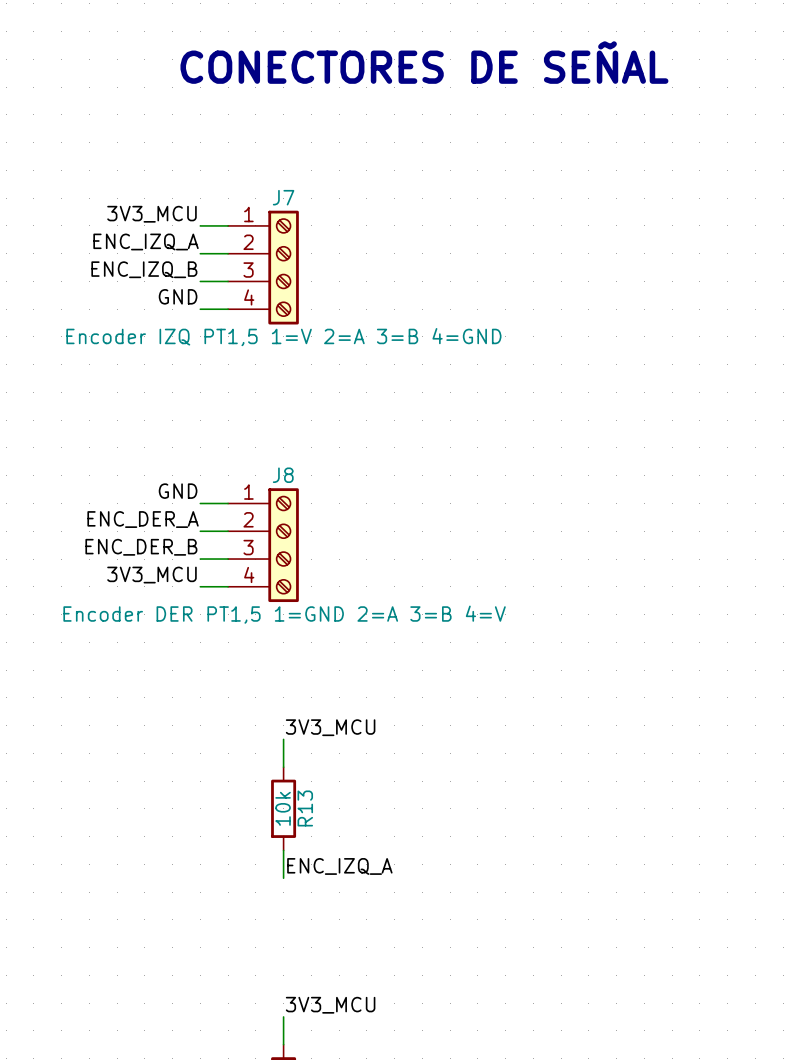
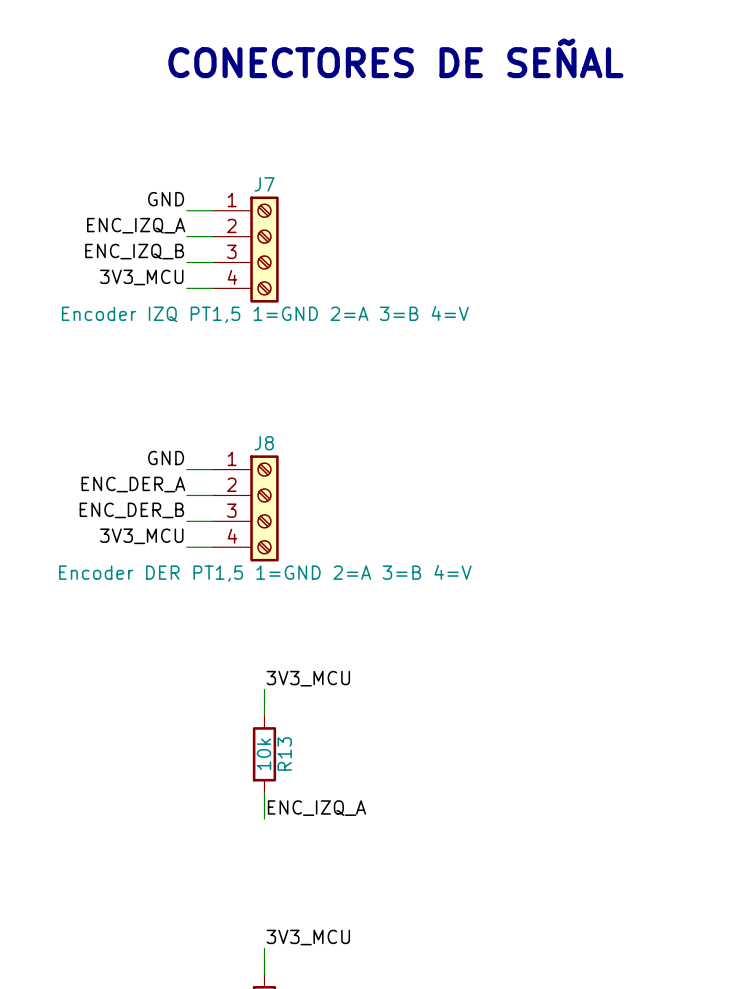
label: 3V3_MCU (151, 214) -> GND (166, 199)
label: GND (178, 296) -> 3V3_MCU (141, 277)
J7 value: Encoder IZQ PT1,5 1=V 2=A 3=B 4=GND (283, 337) -> Encoder IZQ PT1,5 1=GND 2=A 3=B 4=V (265, 314)

